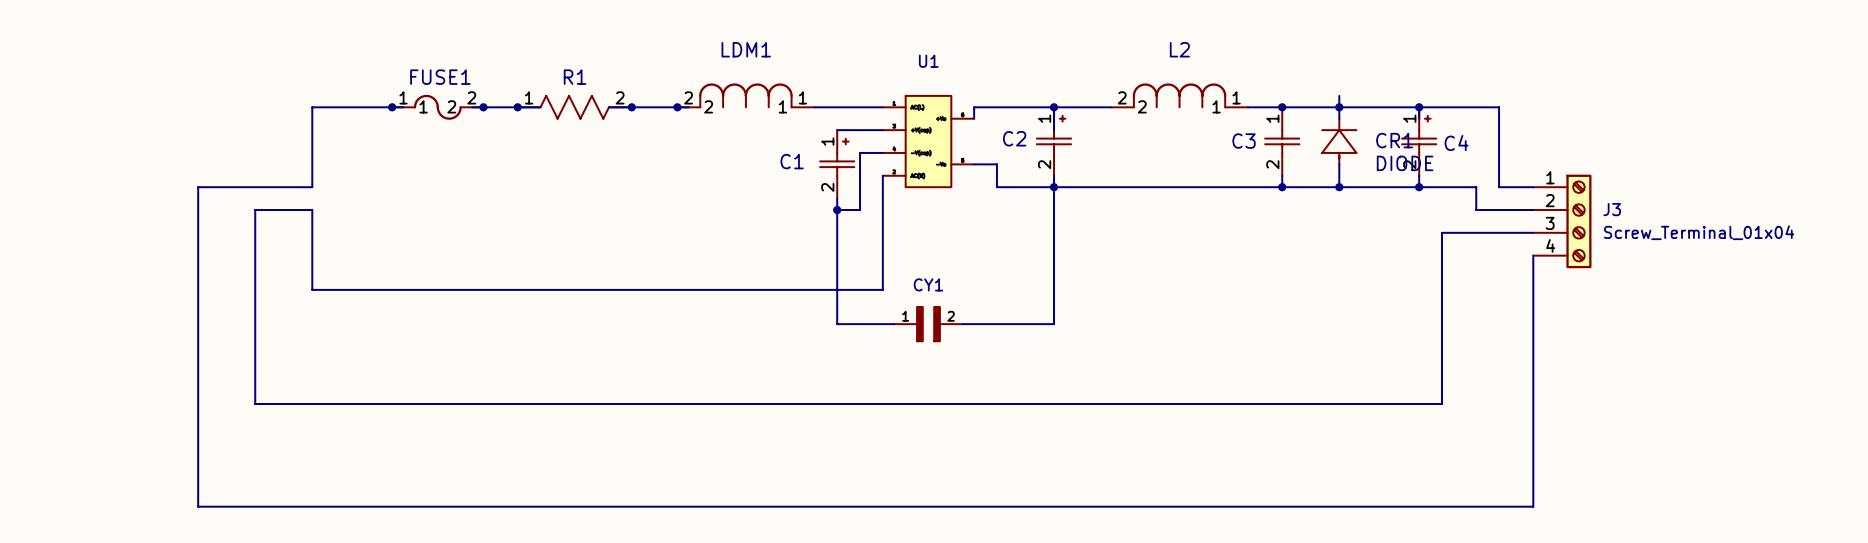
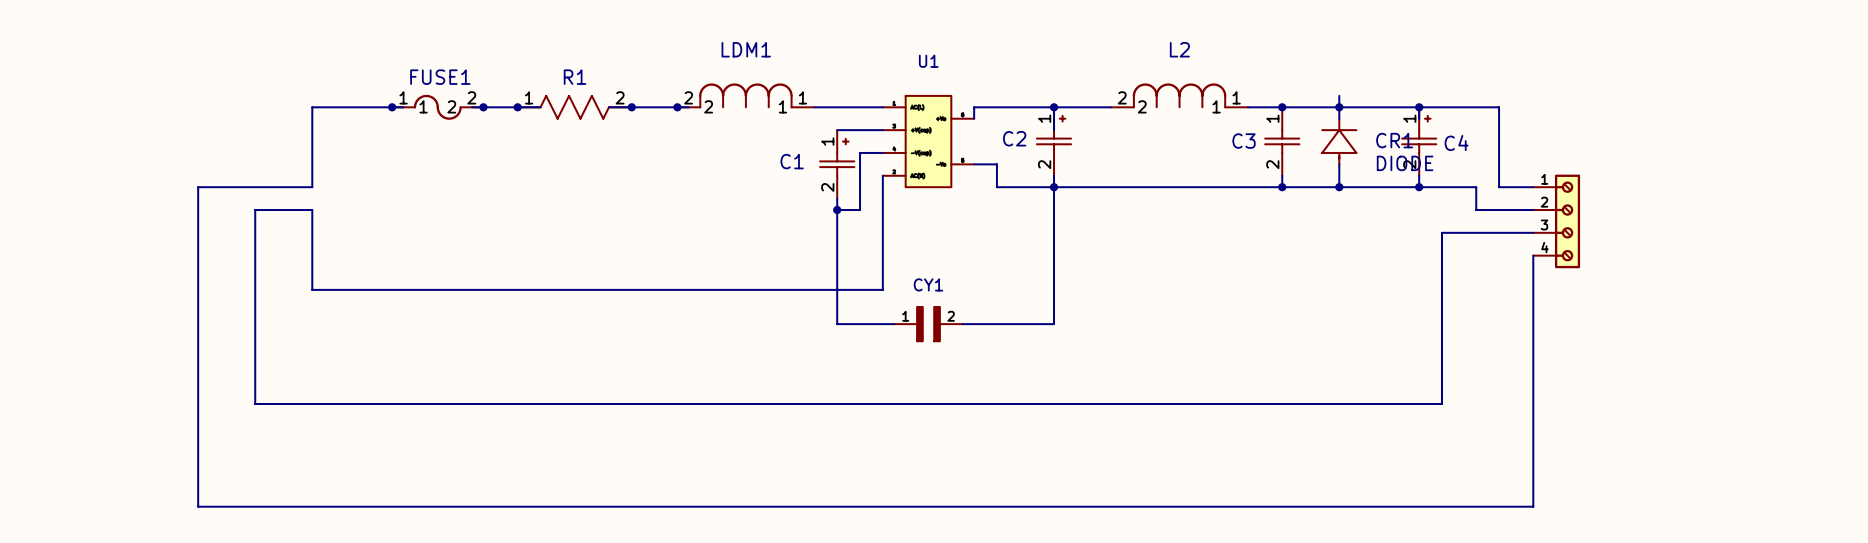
part: none -> (1556, 221)
J3: Screw_Terminal_01x04 (1562, 221) -> none

